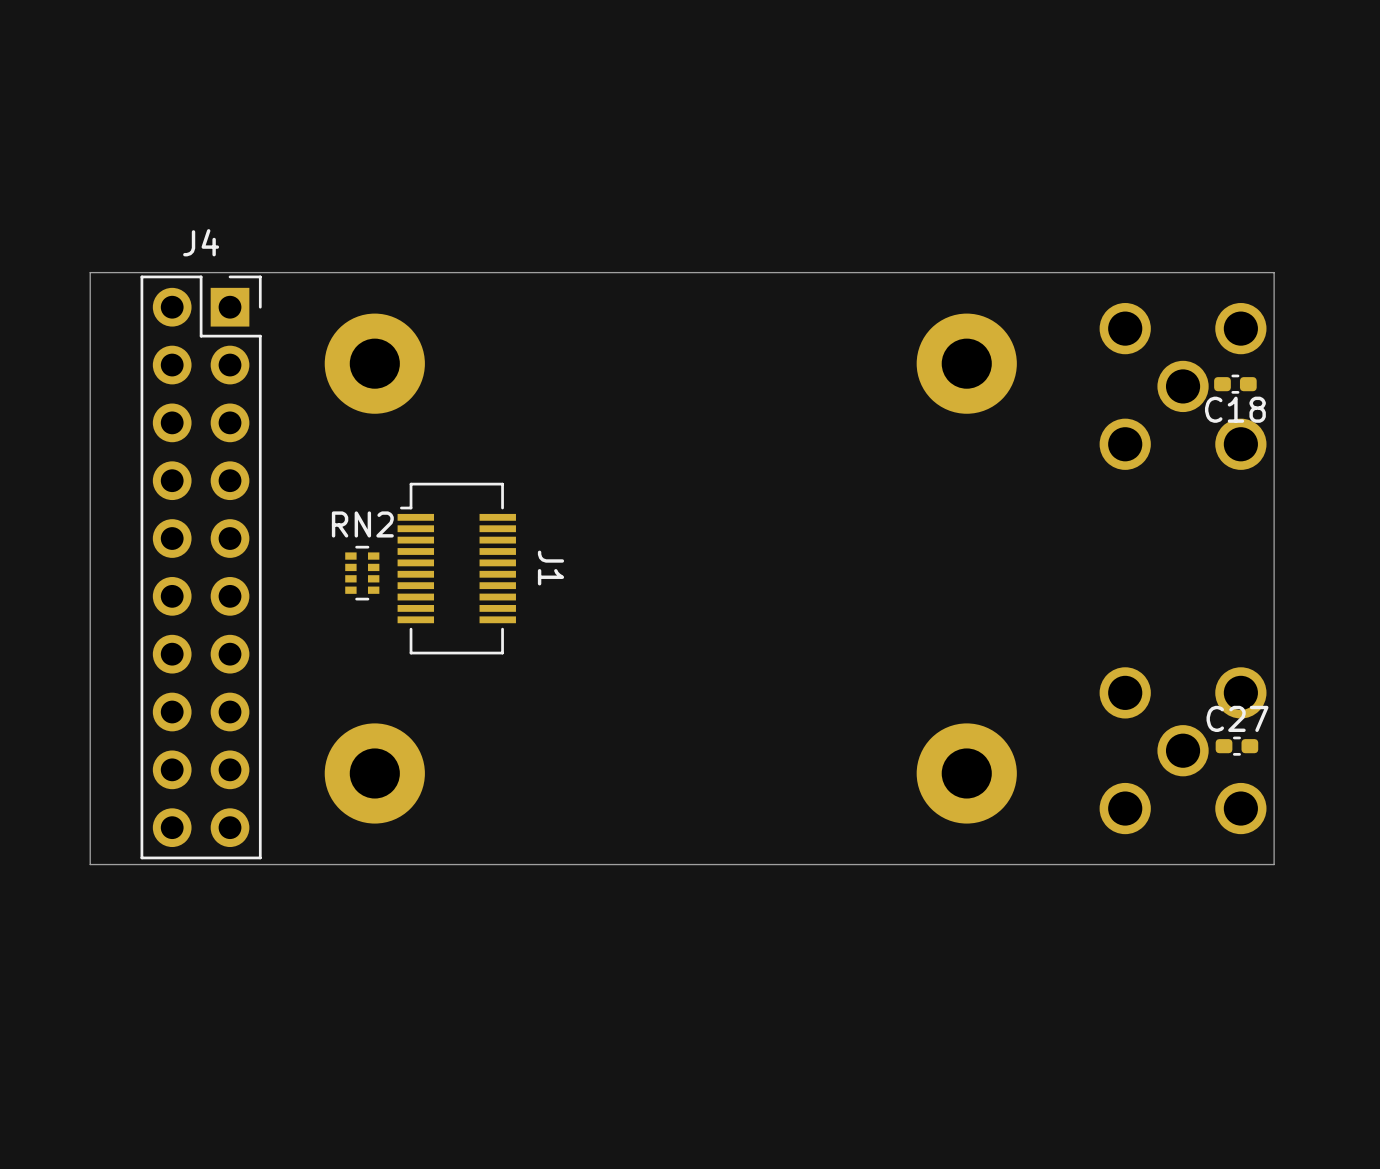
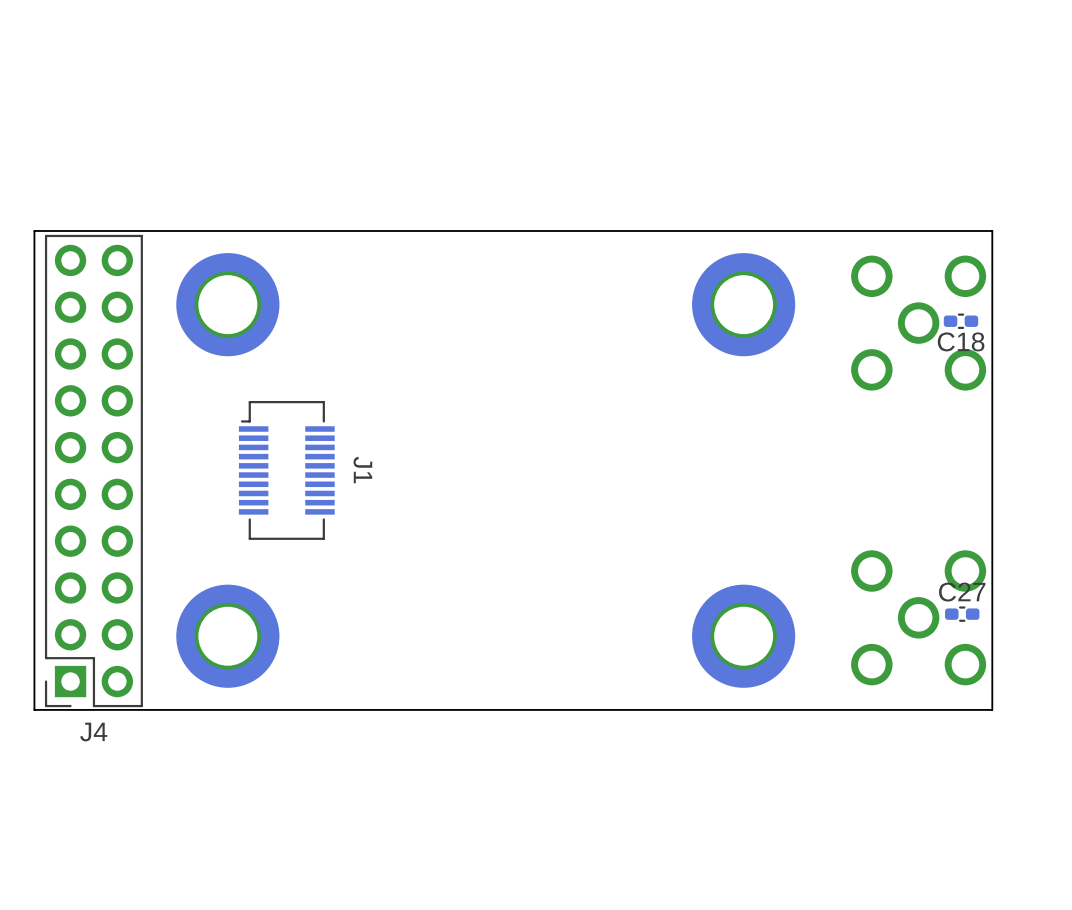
part footprint: [916, 313, 1017, 414] -> [692, 253, 796, 357]
part: none -> (227, 304)
part: (374, 363) -> none
J4 rotation: 0° (201, 567) -> 180° (93, 471)
J1 position: (456, 568) -> (286, 470)
RN2: (362, 573) -> none
part footprint: [916, 723, 1017, 824] -> [692, 584, 796, 688]
part: none -> (227, 636)
part: (374, 773) -> none

